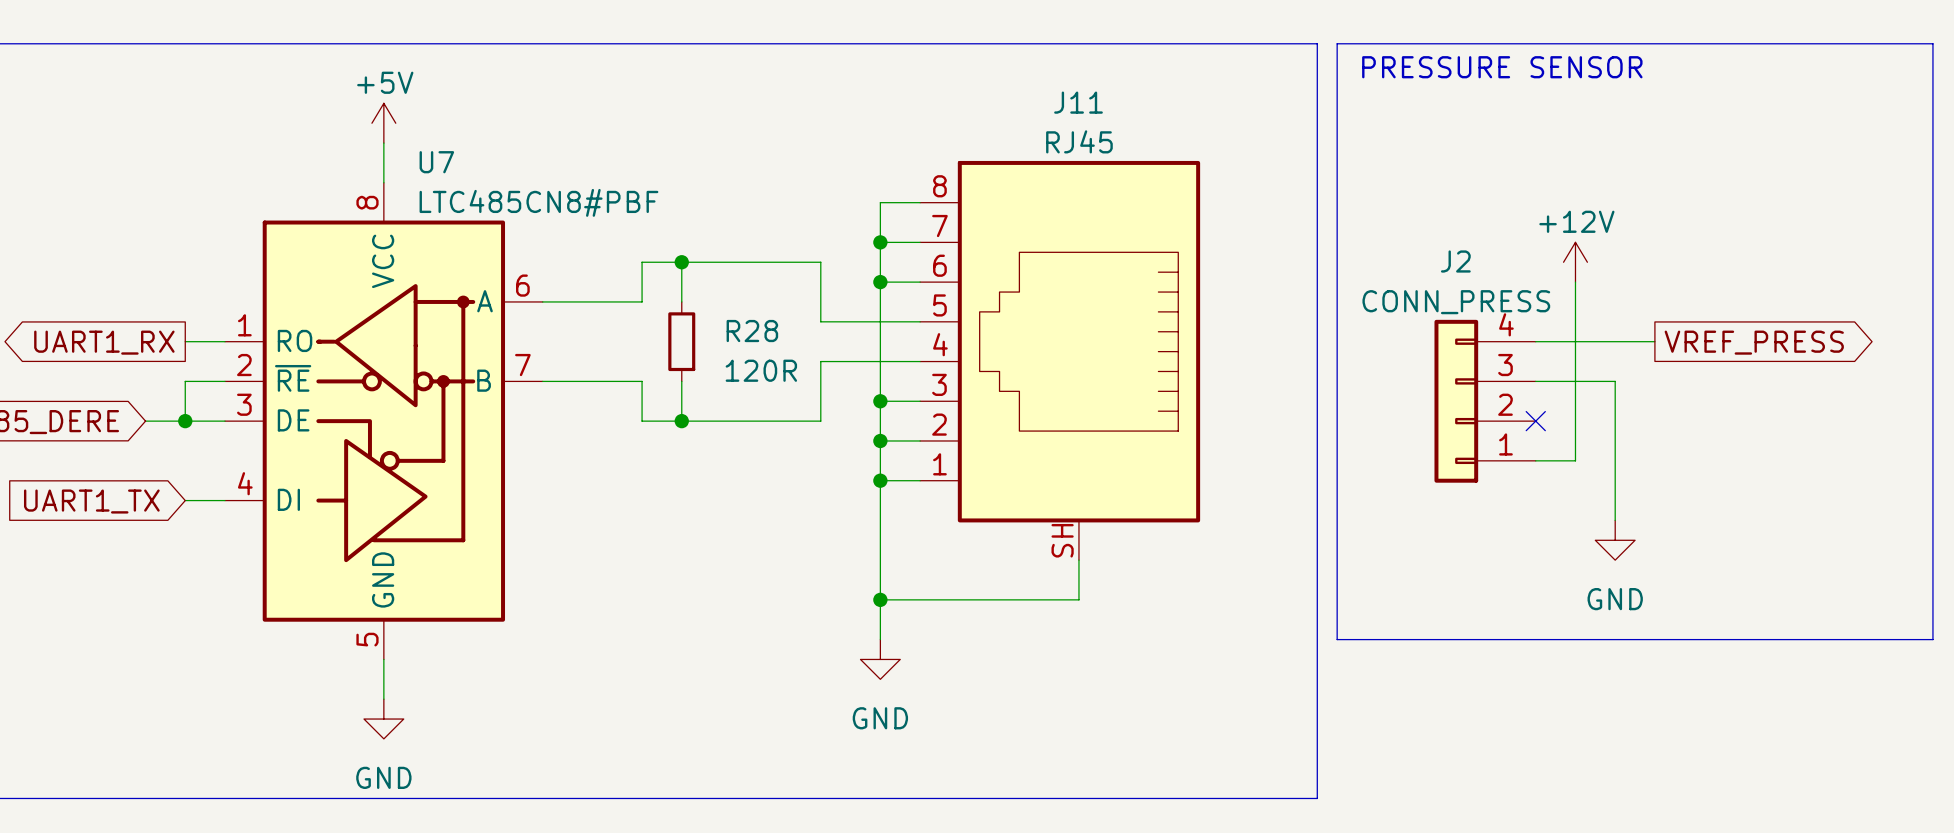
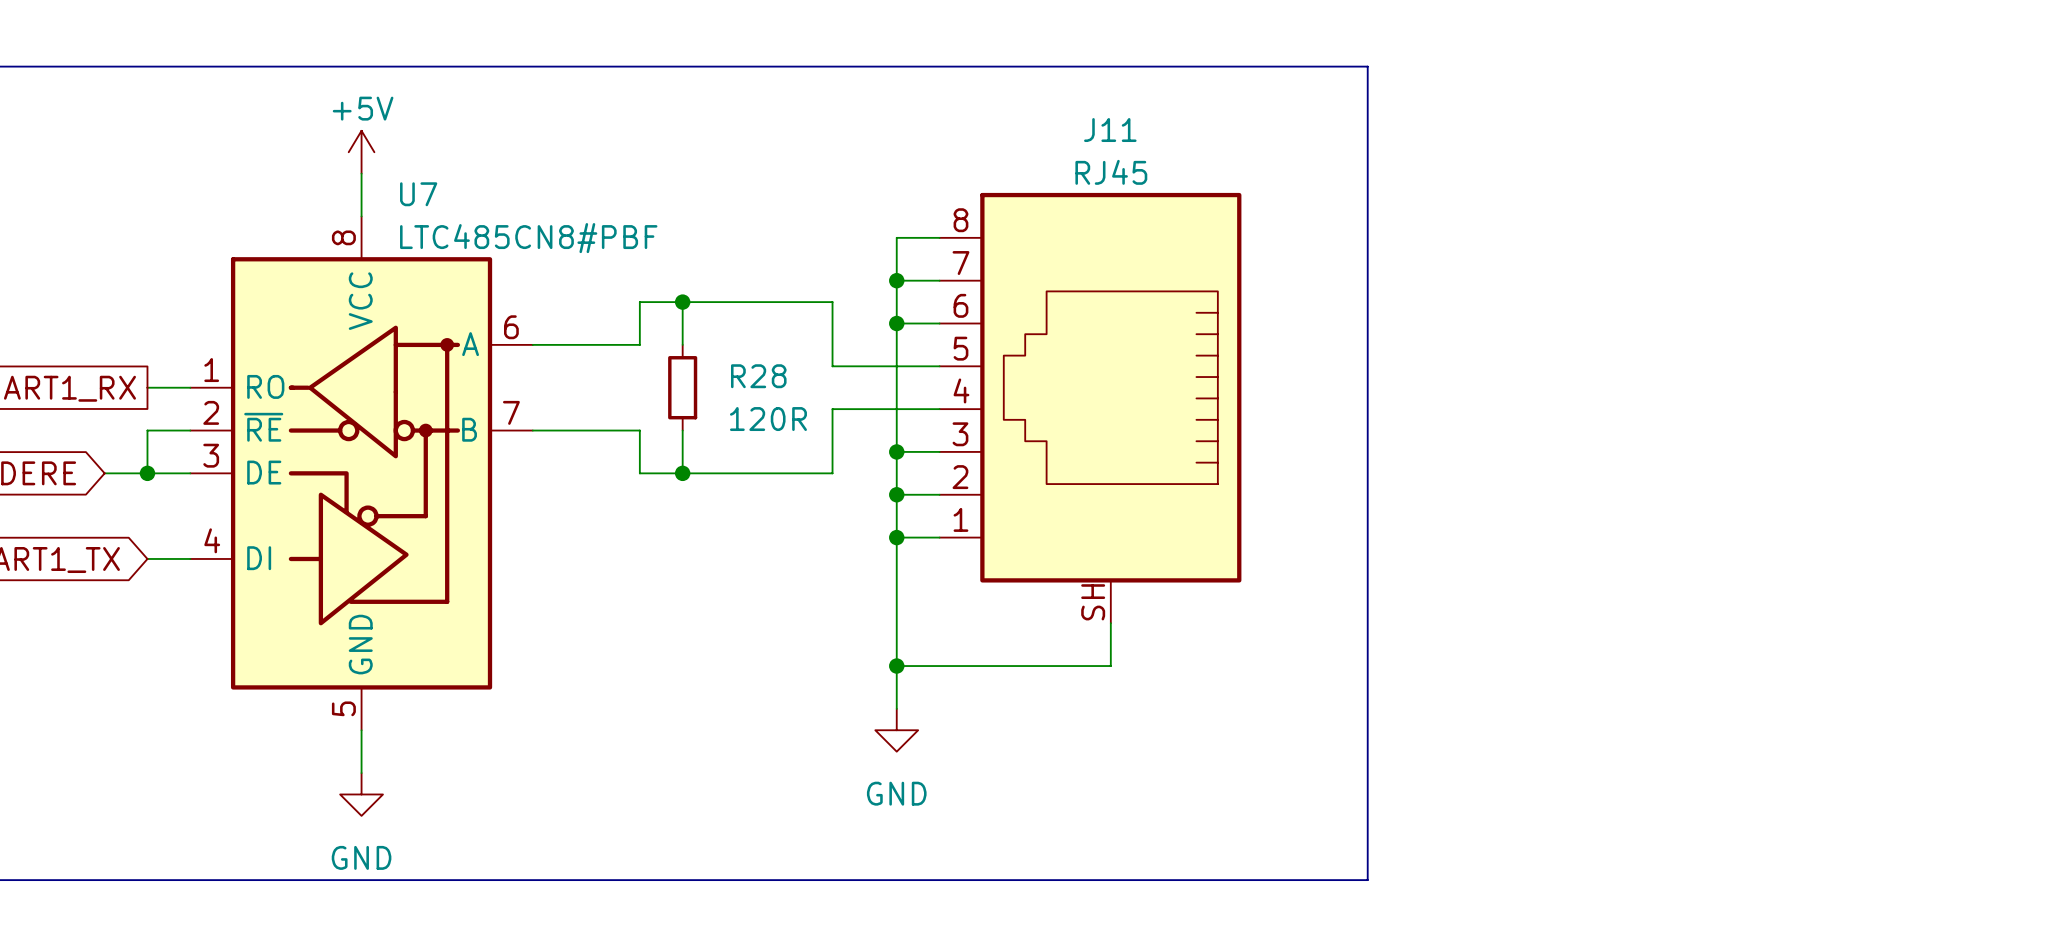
line: (1337, 43) (1932, 43) (1932, 639) (1337, 639) (1337, 43) -> none
text: PRESSURE SENSOR (1502, 67) -> none
power symbol: +12V (1575, 262) -> none
wire: (1575, 282) (1575, 460) (1535, 460) -> none
wire: (1535, 341) (1654, 341) -> none
global label: VREF_PRESS (1754, 342) -> none
wire: (1535, 381) (1615, 381) (1615, 520) -> none
J2: CONN_PRESS (1485, 401) -> none
no-connect mark: (1535, 421) -> none
power symbol: GND (1615, 540) -> none

